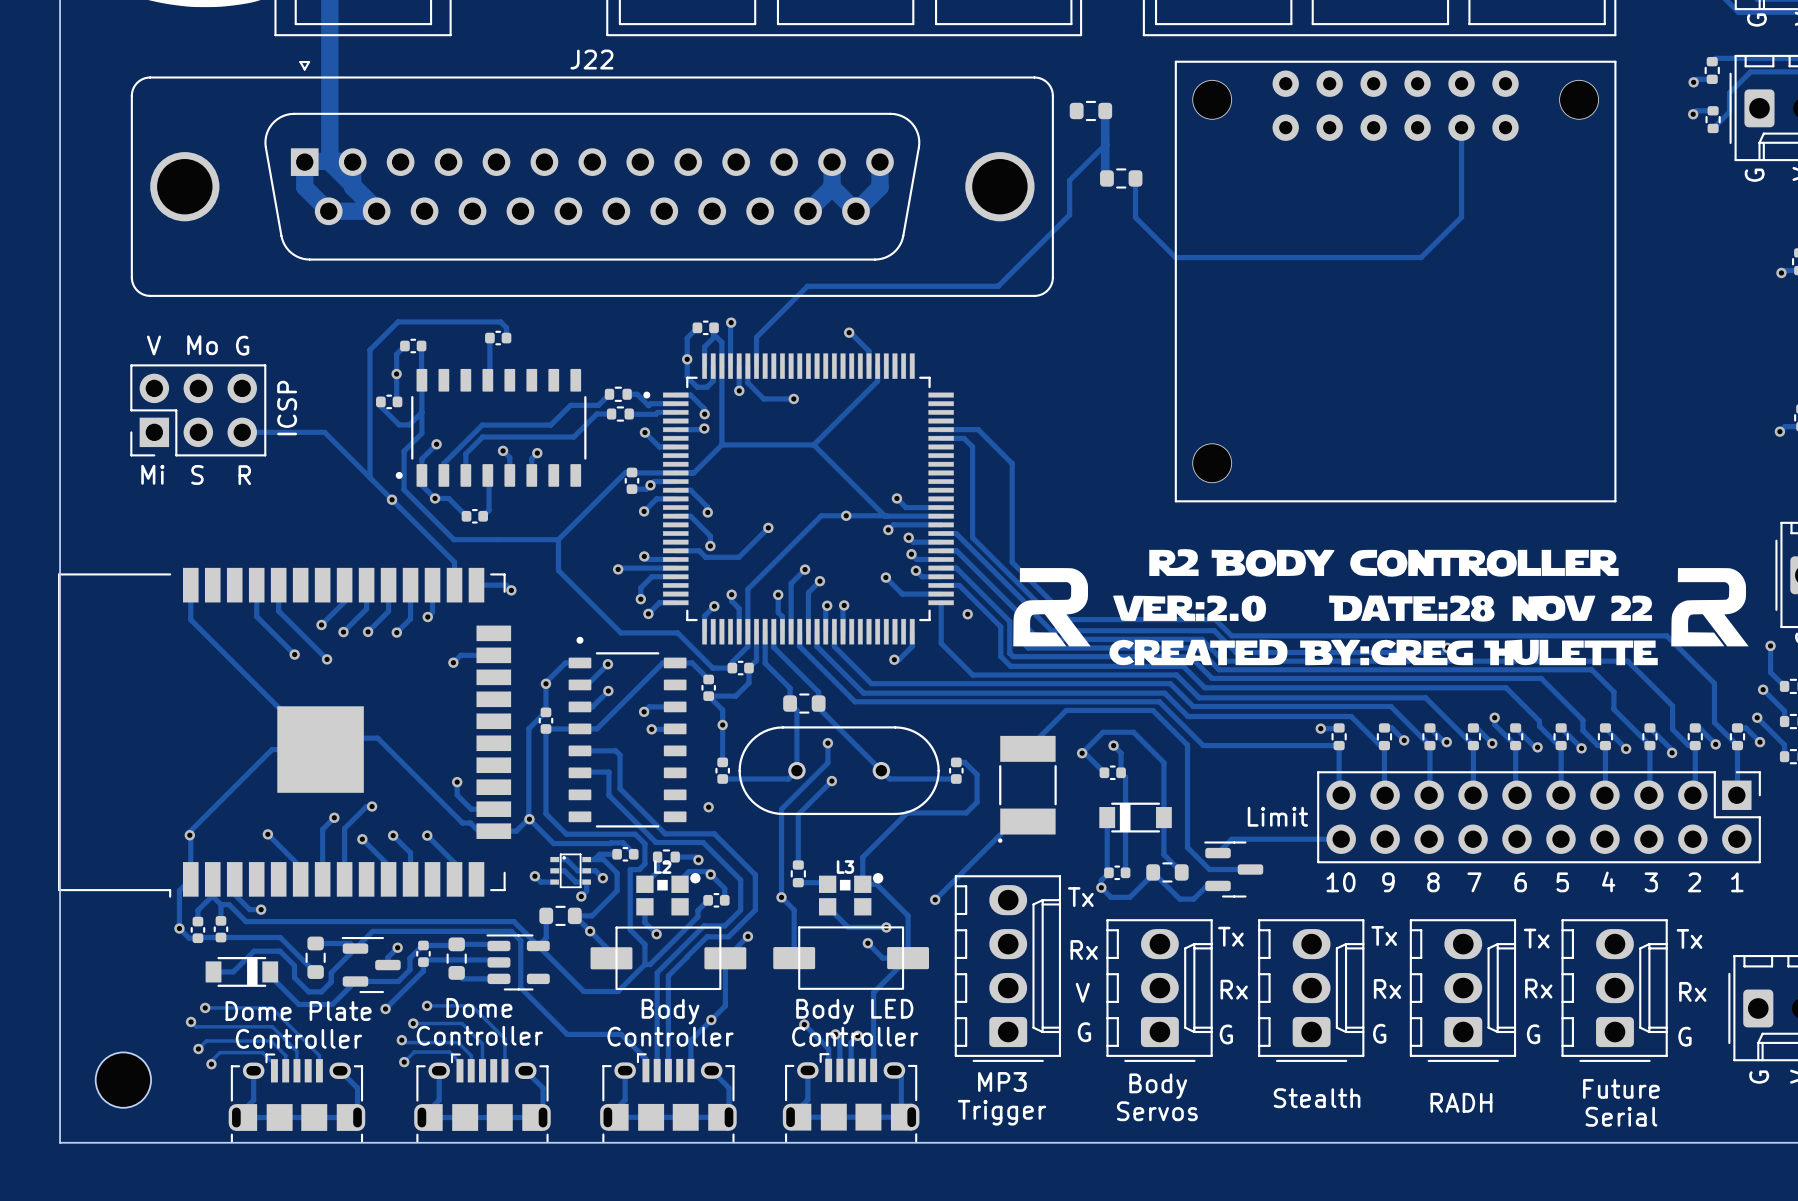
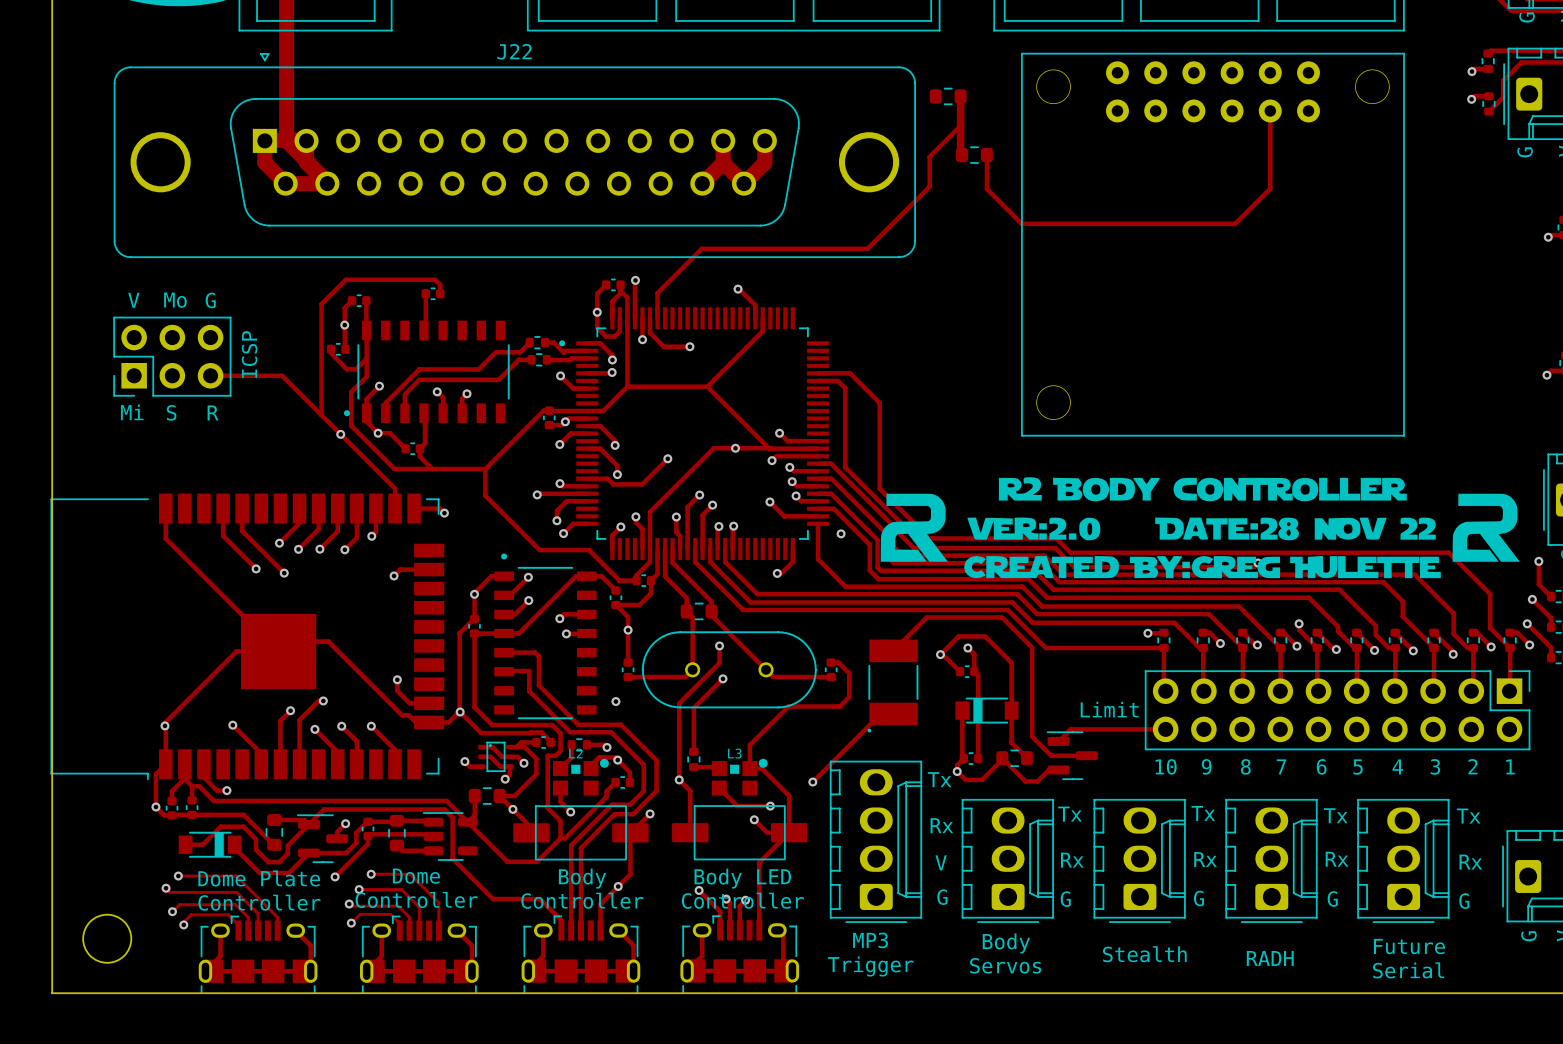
track: none -> (419, 448) (419, 456) (432, 469)

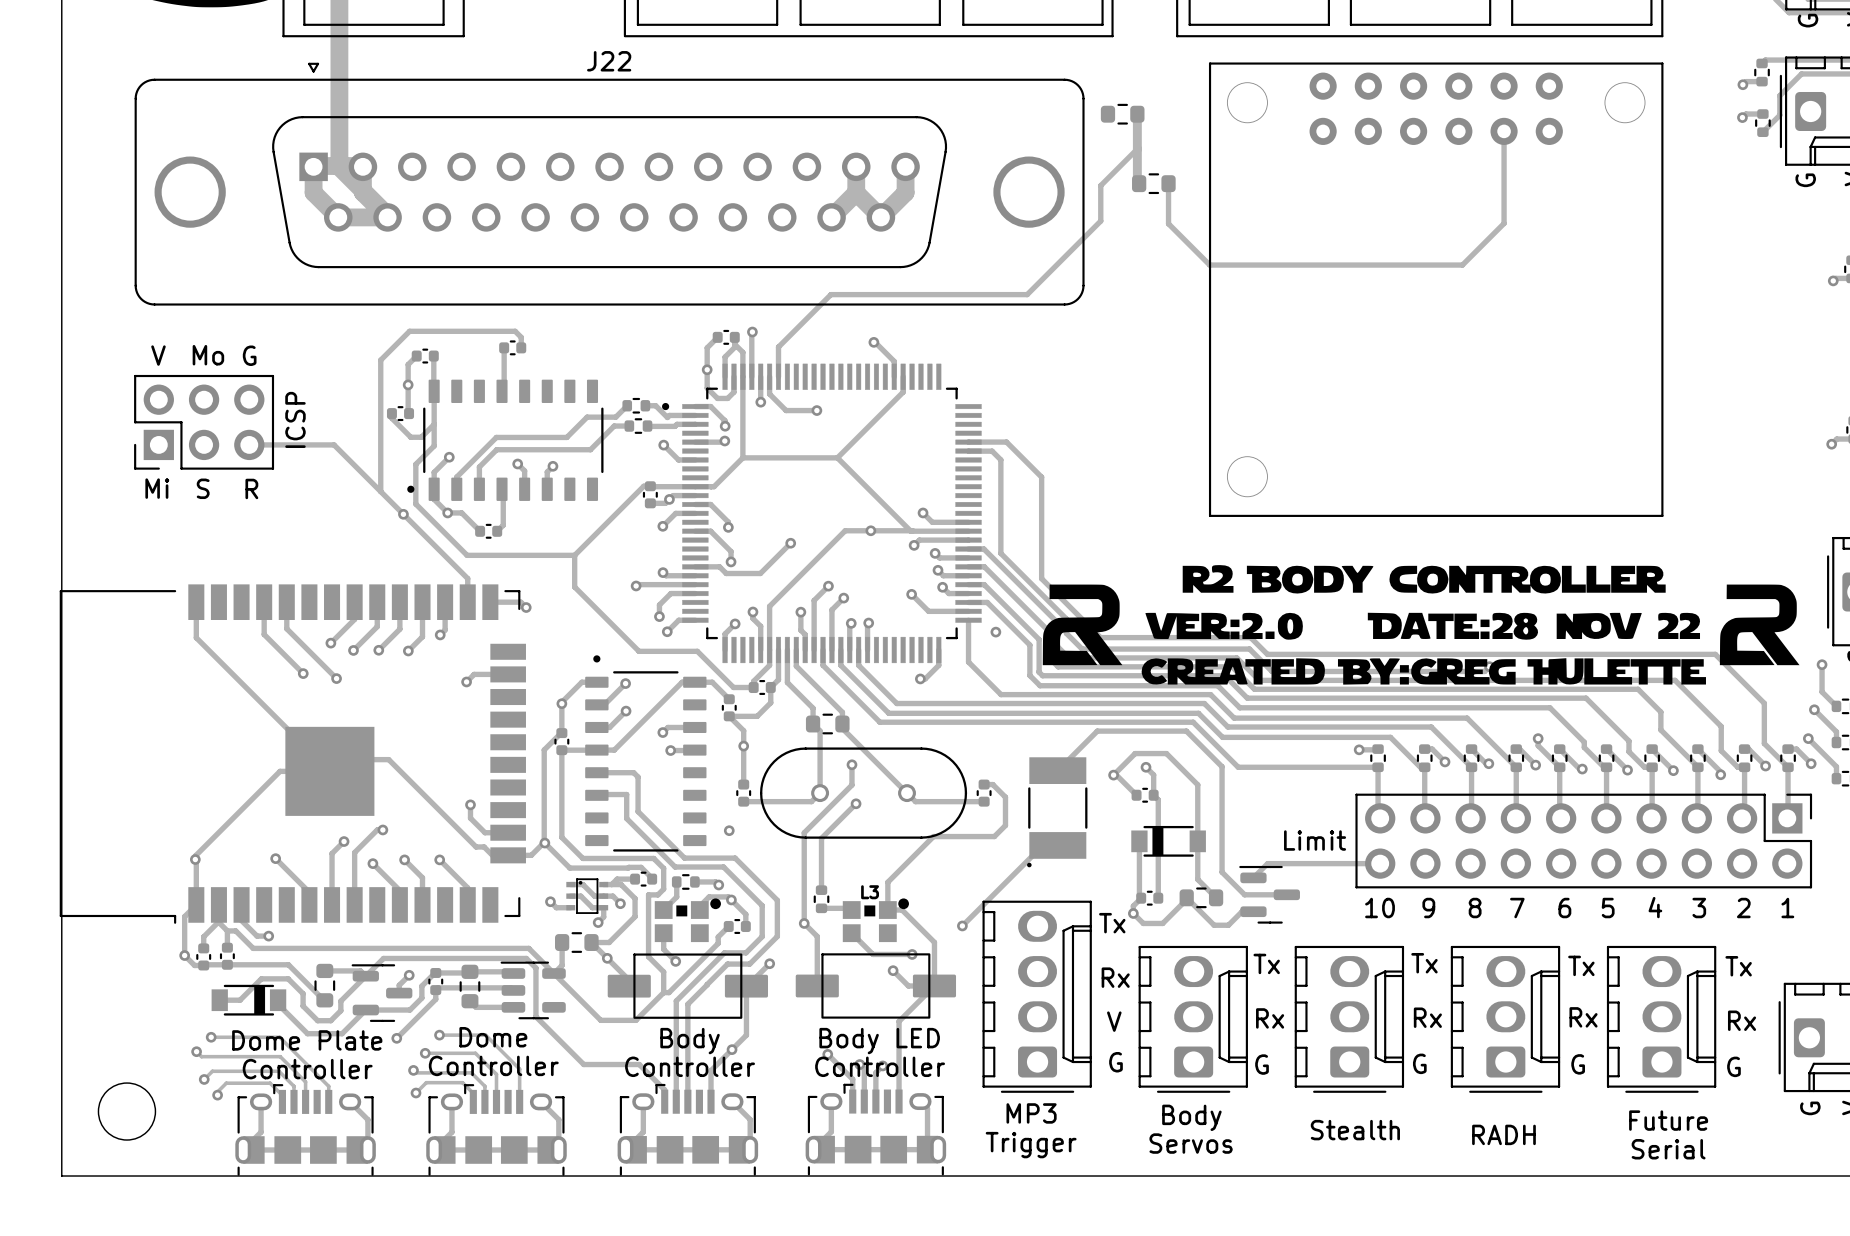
track: (419, 448) (419, 456) (432, 469) -> none
L2 name: L2 (575, 753) -> none

